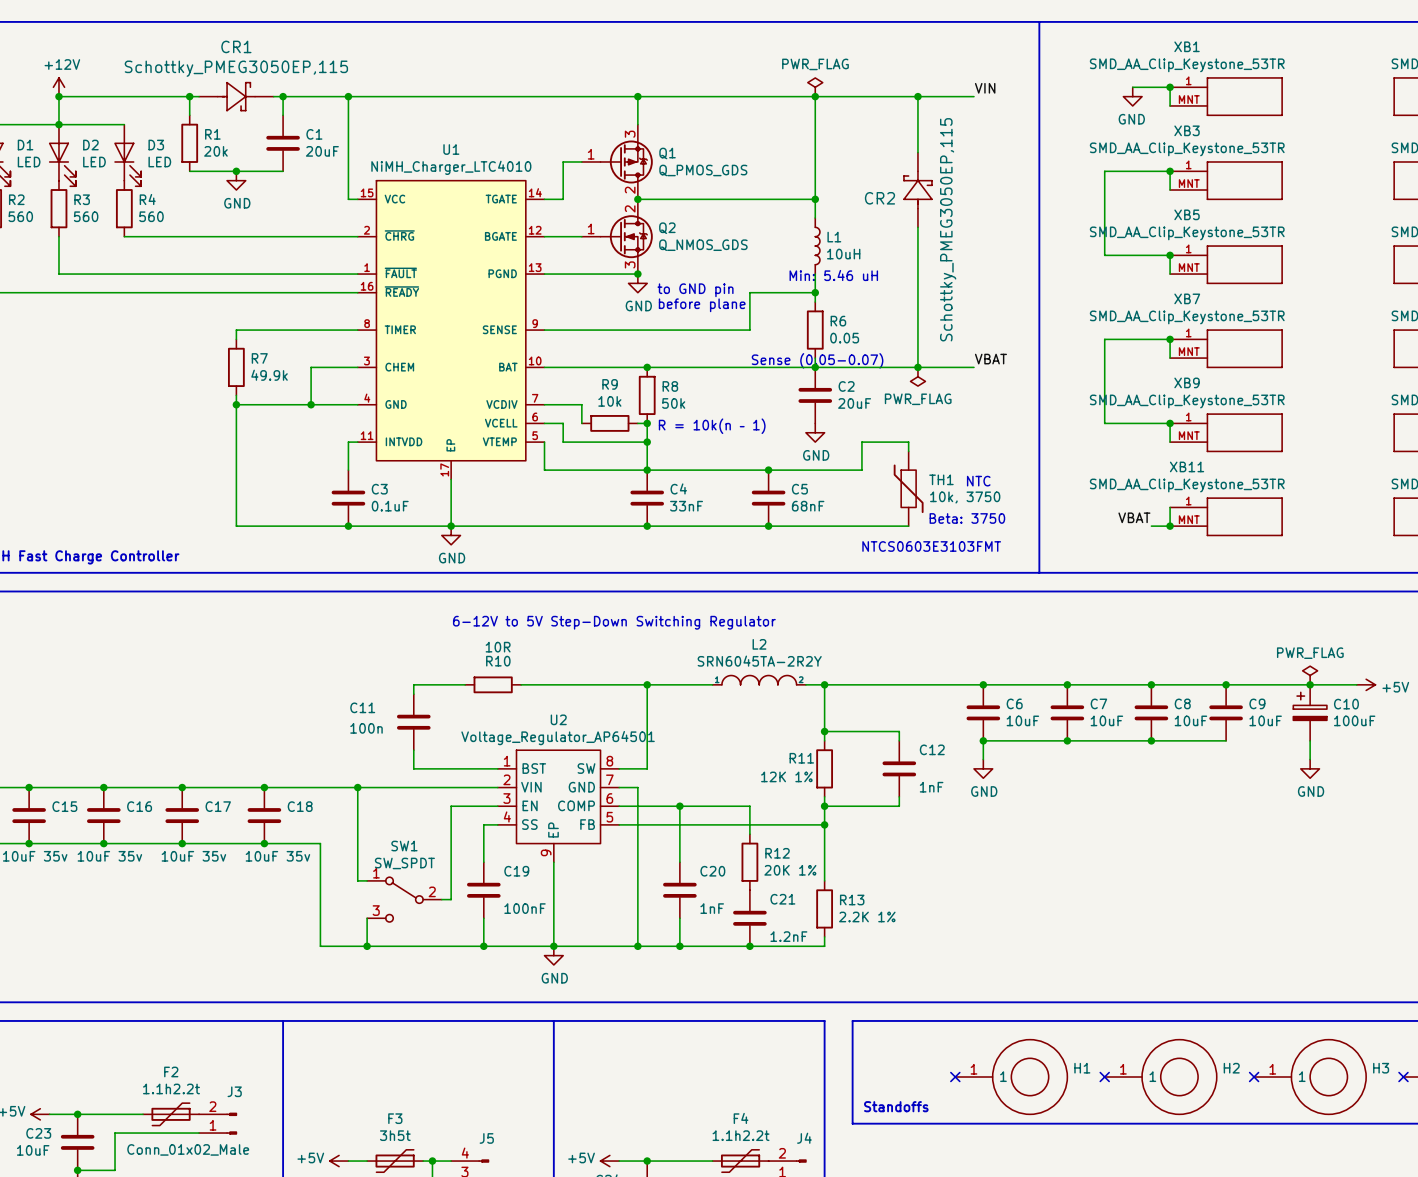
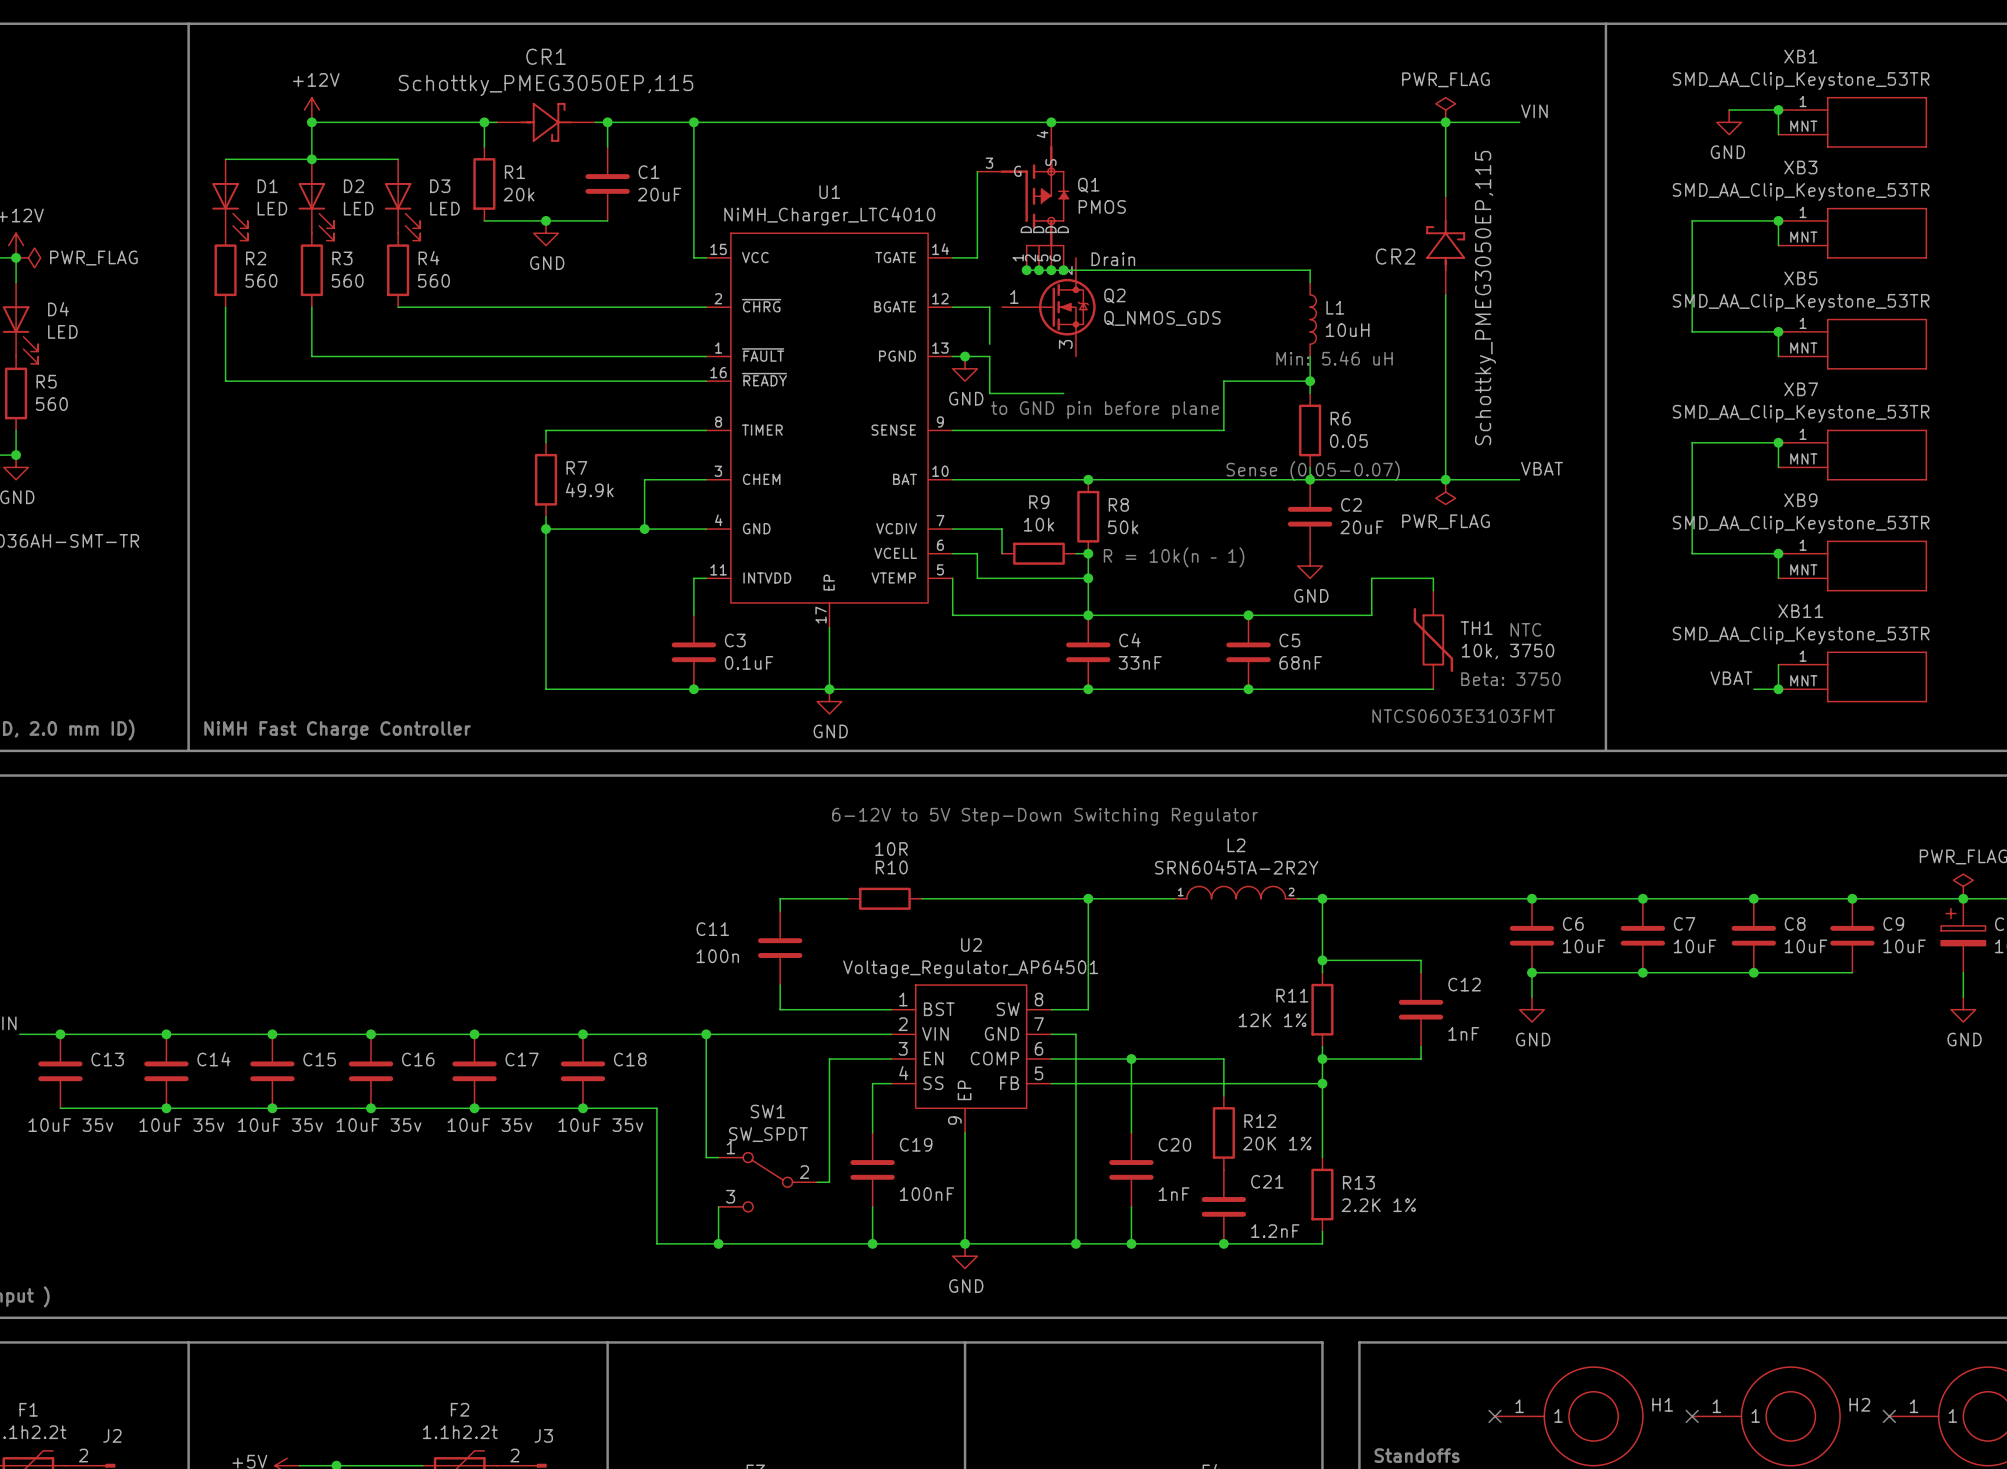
power symbol position: PWR_FLAG (815, 87) -> PWR_FLAG (1445, 110)
wire: (637, 96) (637, 124) -> none
junction position: (637, 96) -> (1051, 122)
wire: (815, 96) (815, 208) -> (1026, 270) (1310, 270)
junction: (815, 96) -> none
Q1 symbol: [581, 124, 653, 200] -> [977, 122, 1070, 271]
wire: (563, 161) (581, 161) -> (977, 208) (977, 171)
Q1 value: Q_PMOS_GDS (703, 170) -> PMOS (1102, 206)
wire: (637, 199) (815, 199) -> none
junction: (637, 199) -> none
junction: (815, 199) -> none
label: none -> Drain (1113, 259)
junction: none -> (1026, 270)
junction: none -> (1038, 270)
junction: none -> (1051, 270)
junction: none -> (1063, 270)
wire: (572, 236) (581, 236) -> (989, 307) (989, 344)
junction: none -> (965, 356)
wire: (572, 274) (637, 274) -> (989, 356) (989, 393) (1063, 393)
junction: (637, 274) -> none
power symbol position: GND (637, 283) -> GND (965, 368)
text: to GND pin (695, 290) -> none
text: before plane (702, 305) -> to GND pin before plane (1105, 410)

